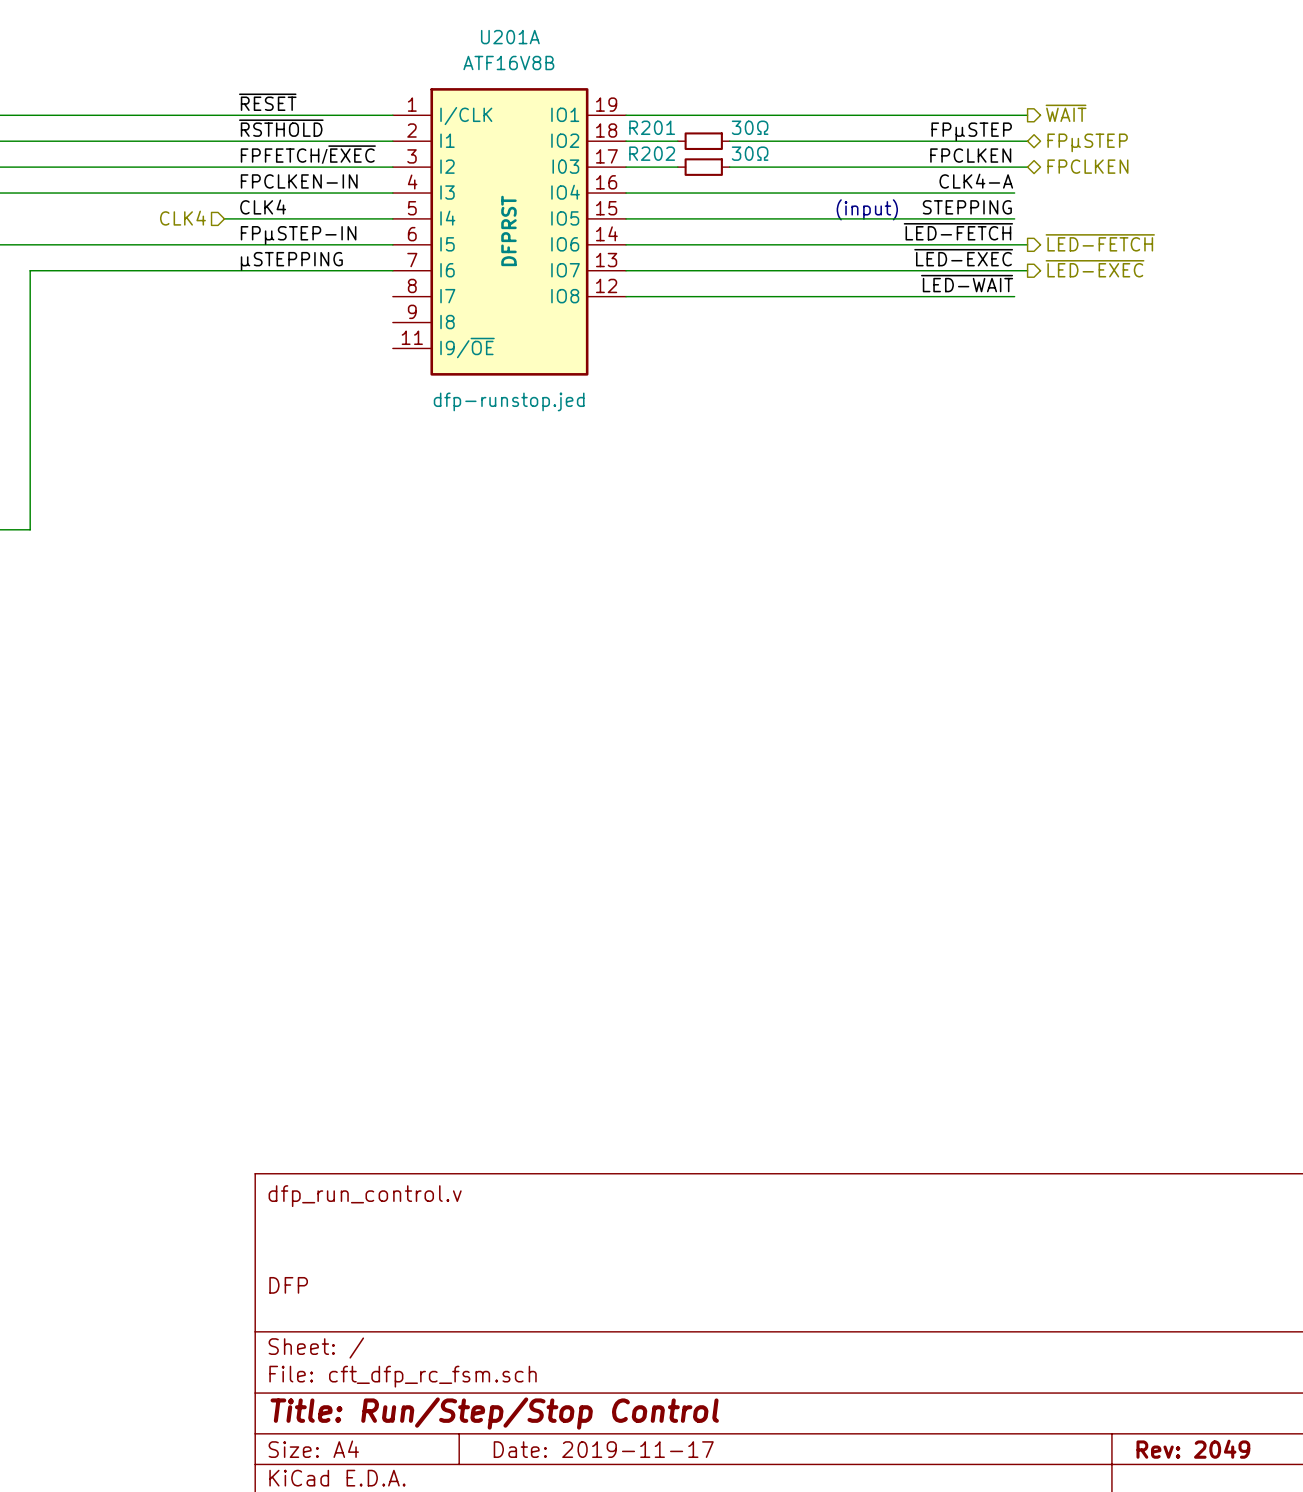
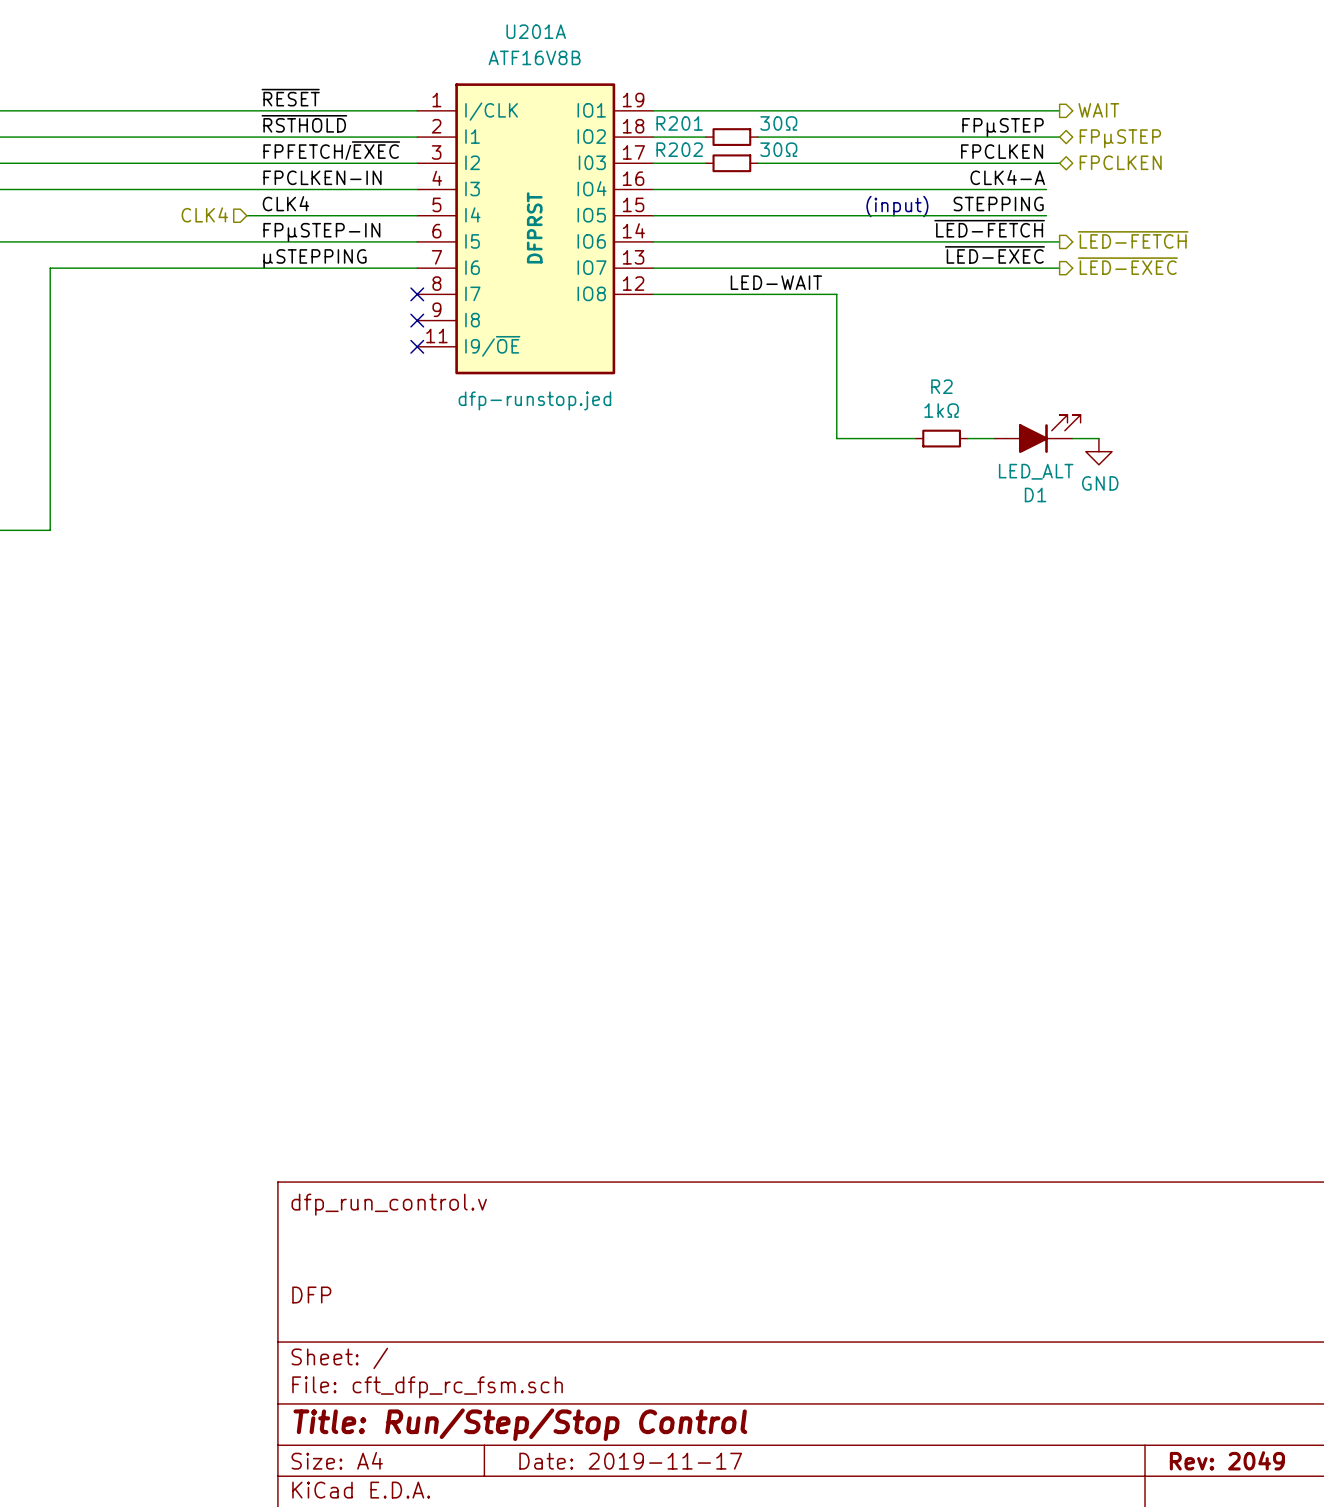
hierarchical label: ~{WAIT} (1066, 113) -> WAIT (1098, 110)
label: ~{LED-WAIT} (967, 283) -> none
label: none -> LED-WAIT (776, 282)
no-connect mark: none -> (417, 294)
wire: (807, 296) (1014, 296) -> (836, 294) (836, 438) (915, 438)
no-connect mark: none -> (417, 320)
no-connect mark: none -> (417, 346)
D1: none -> LED_ALT (1037, 433)
R2: none -> 1kΩ (941, 438)
wire: none -> (967, 438) (994, 438)
wire: none -> (1072, 438) (1098, 438)
power symbol: none -> GND (1098, 451)

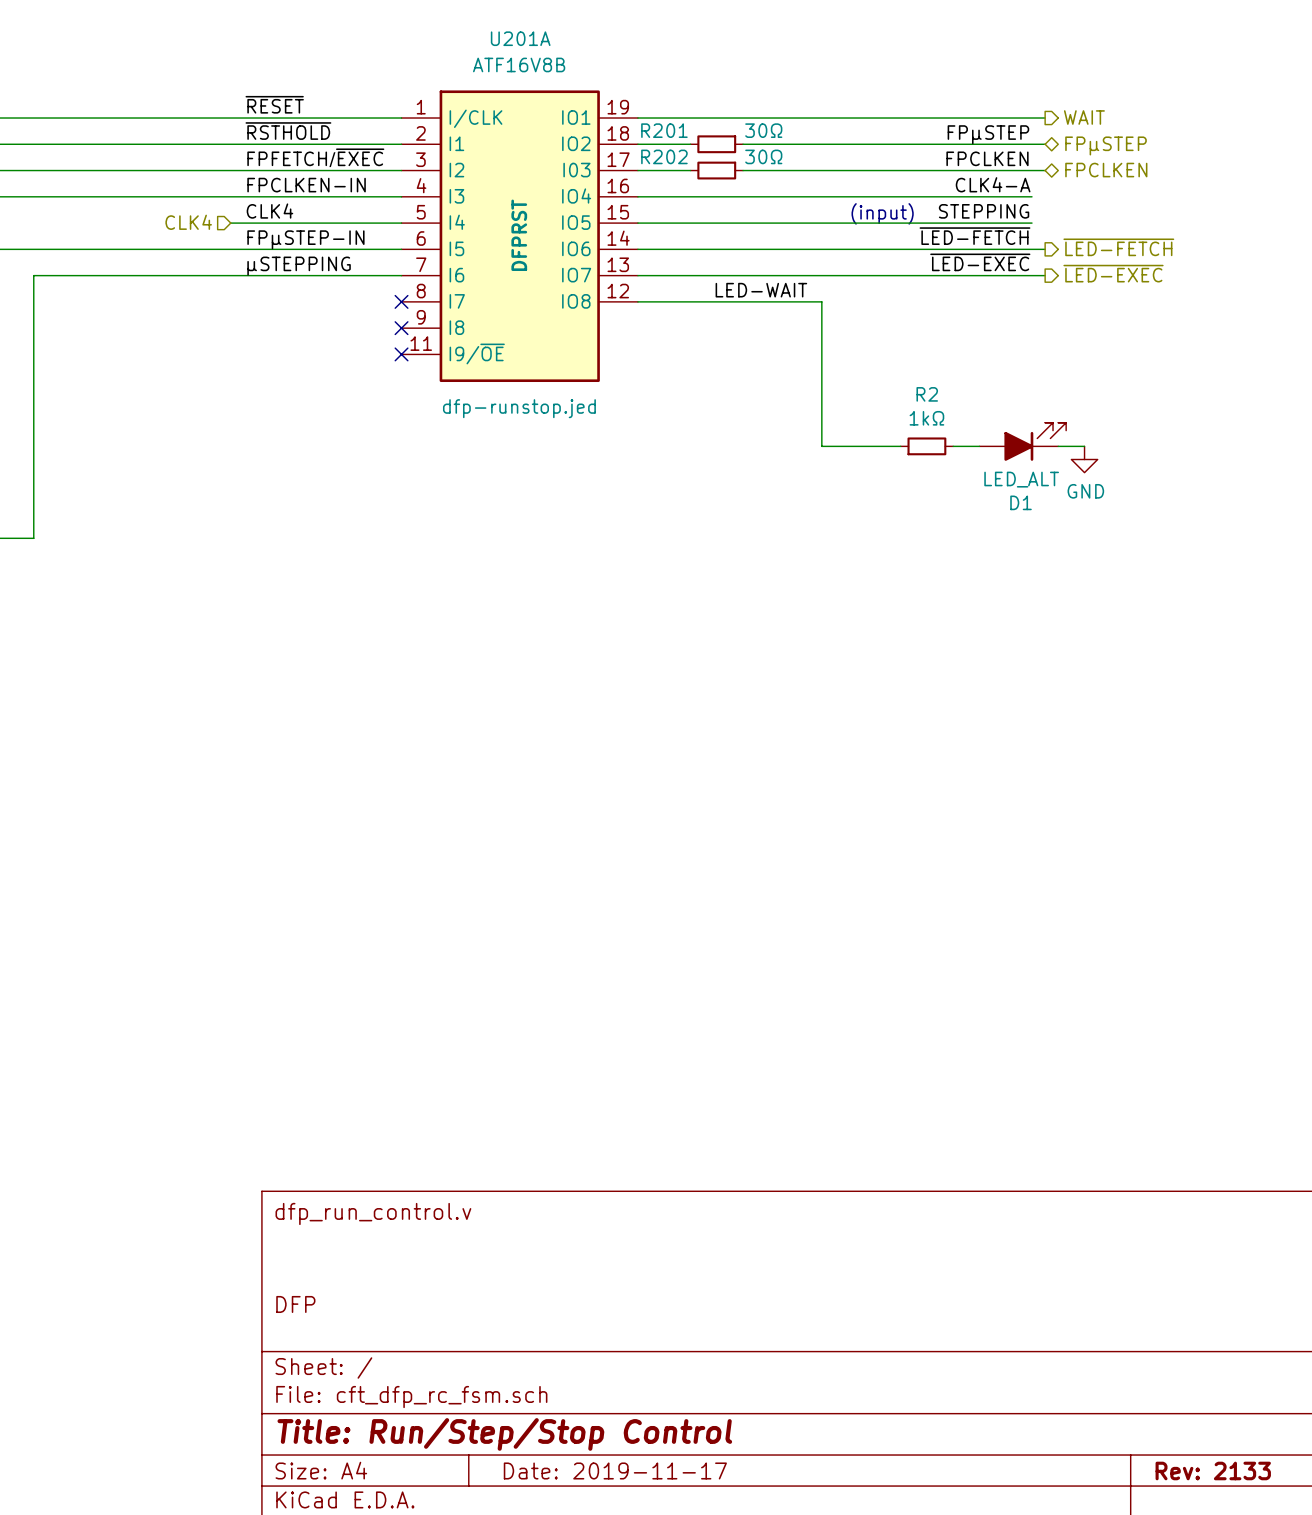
title block: Rev: 2049 (1227, 1460) -> Rev: 2133 (1213, 1470)

